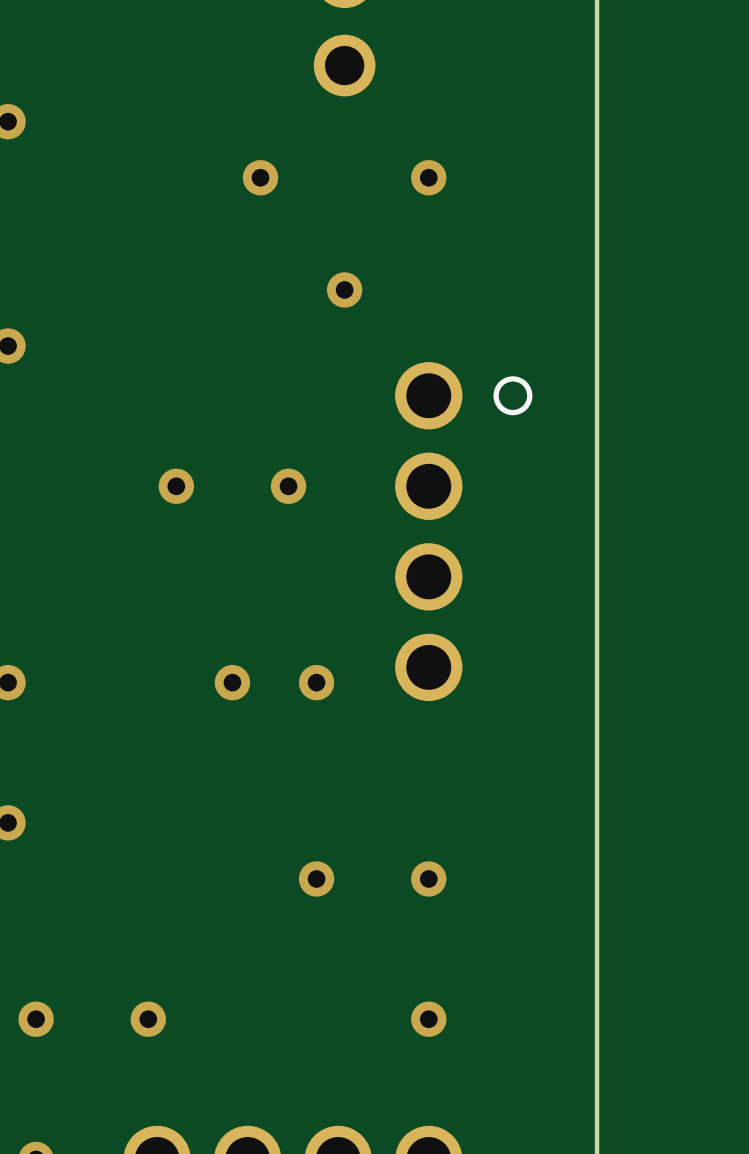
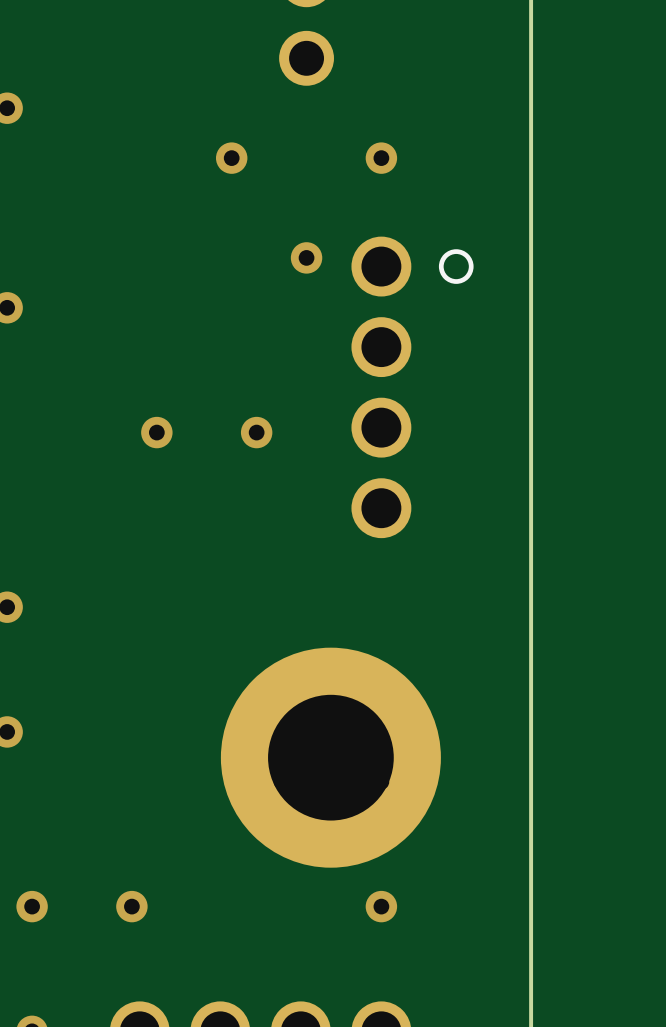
part position: (463, 531) -> (412, 387)
via: (232, 682) -> none
via: (316, 682) -> none
part: none -> (330, 757)

